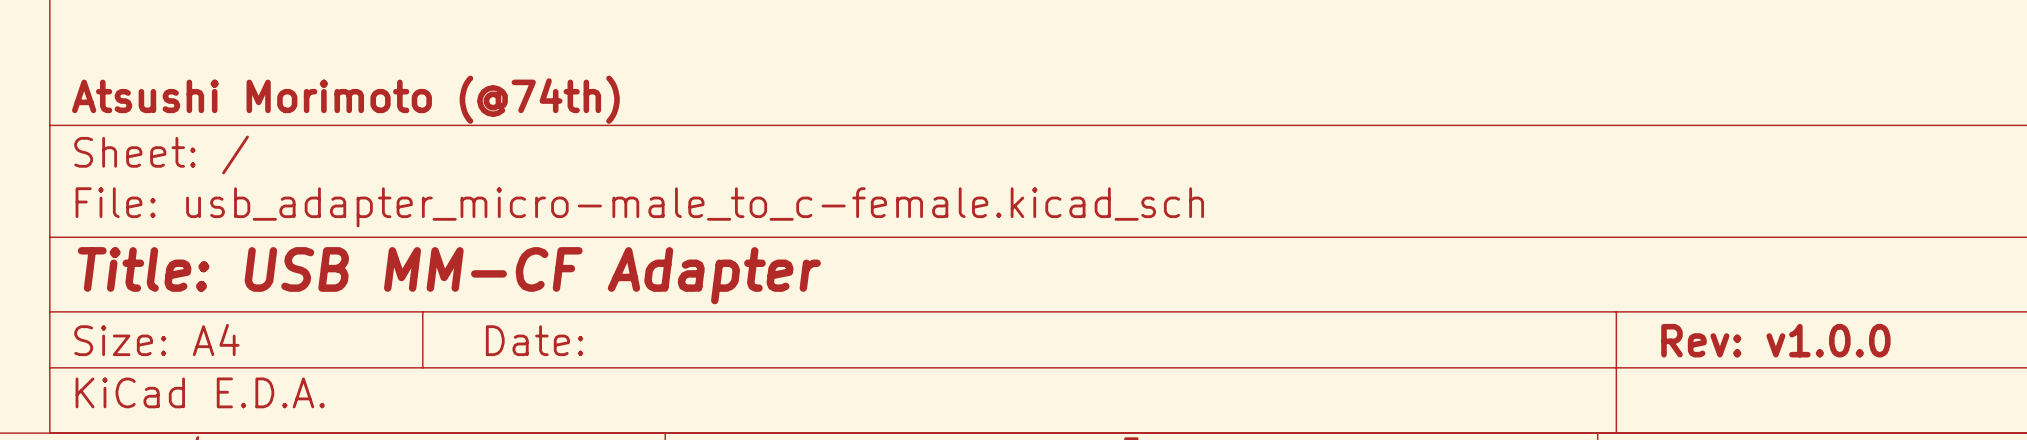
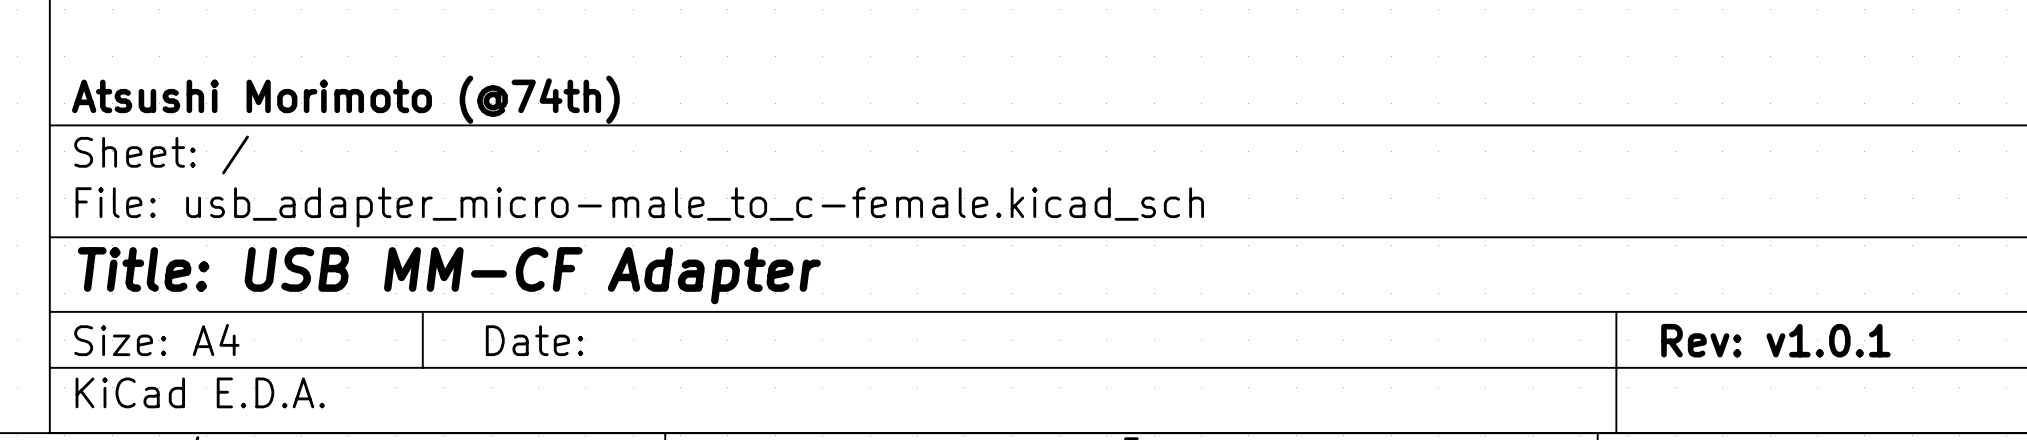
title block: Rev: v1.0.0 (1775, 340) -> Rev: v1.0.1 (1775, 340)

